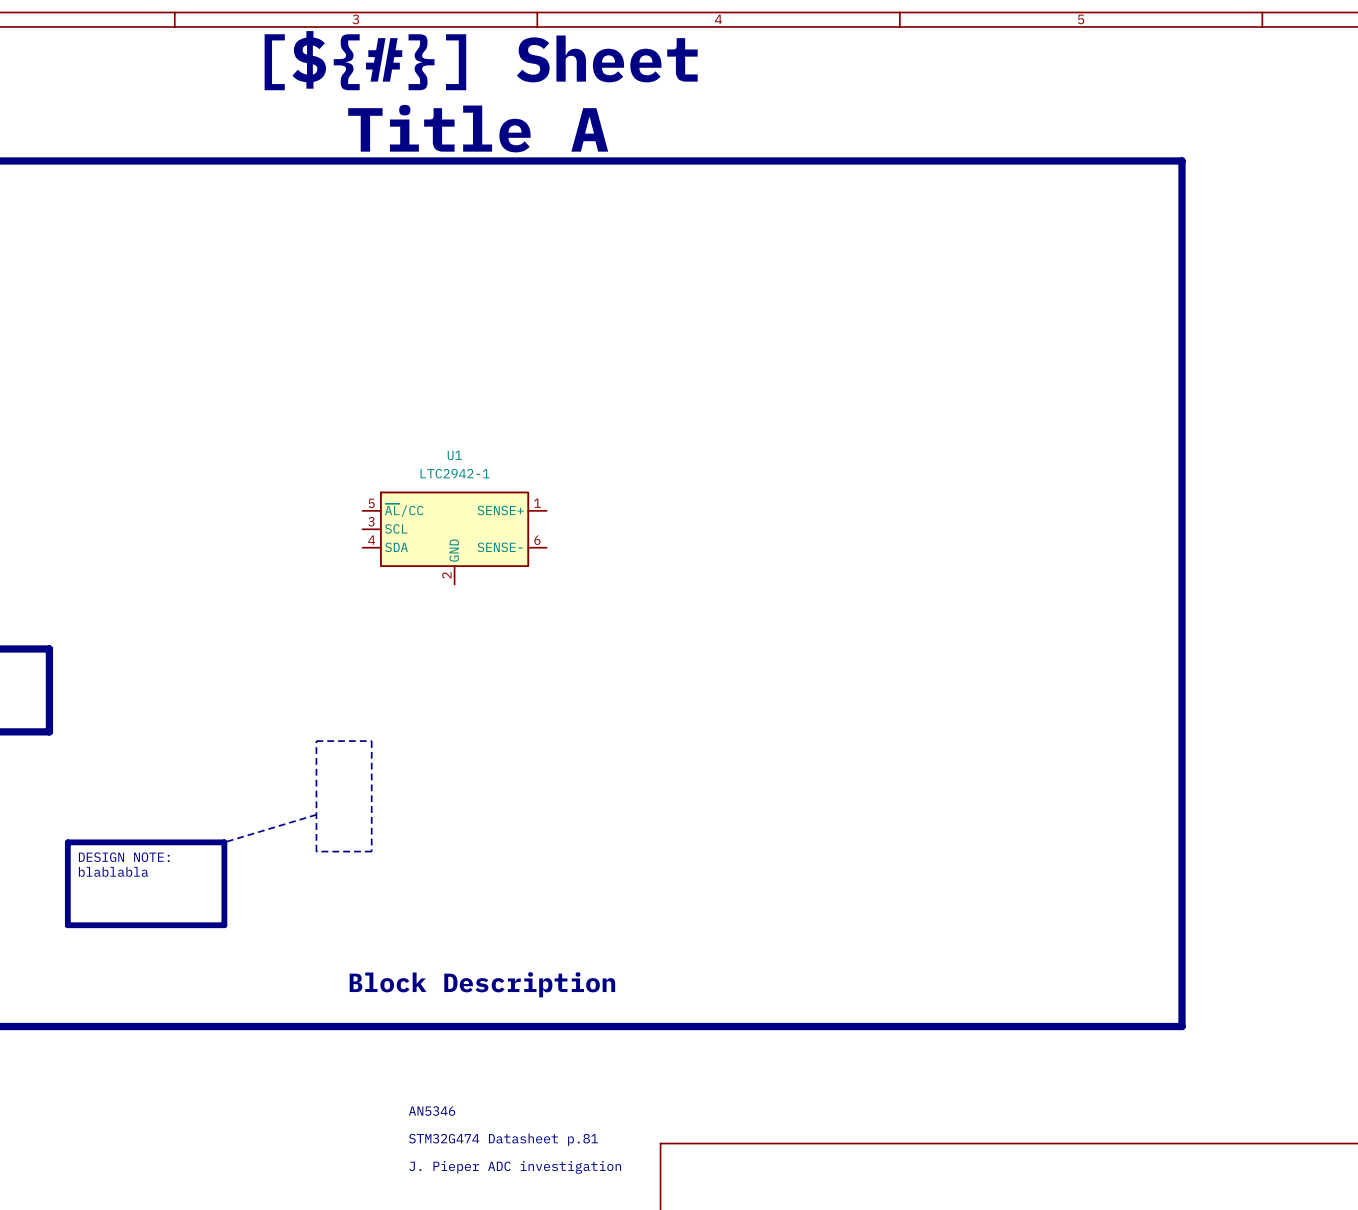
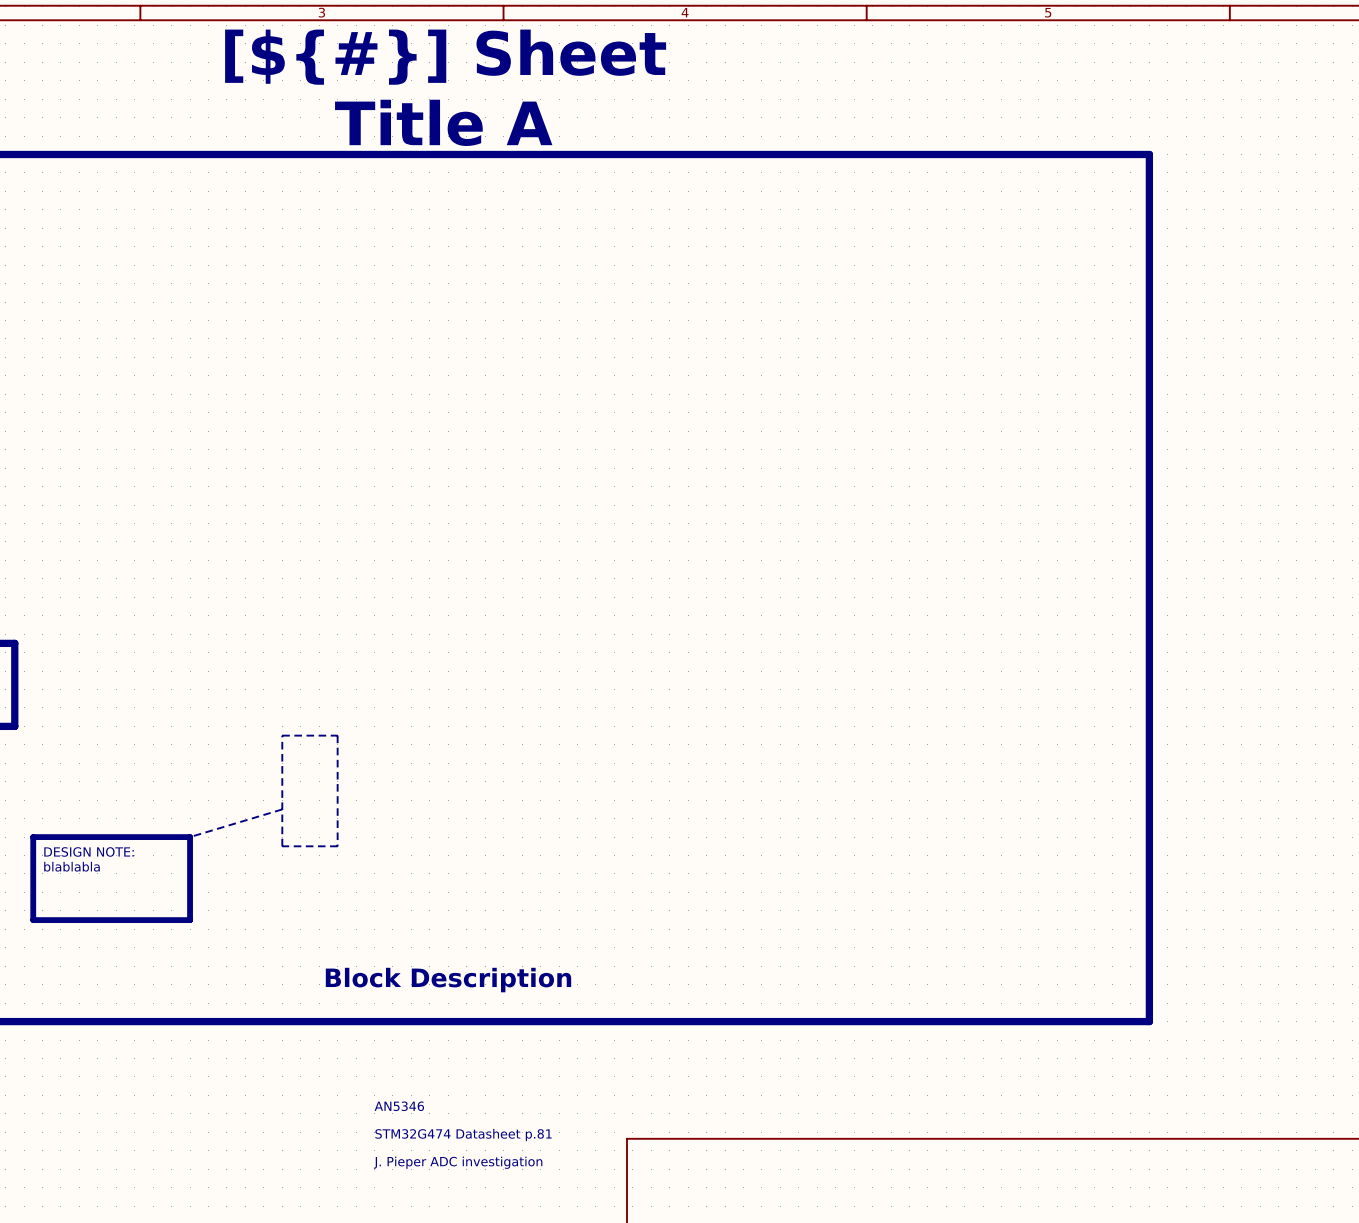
U1: LTC2942-1 (454, 538) -> none

